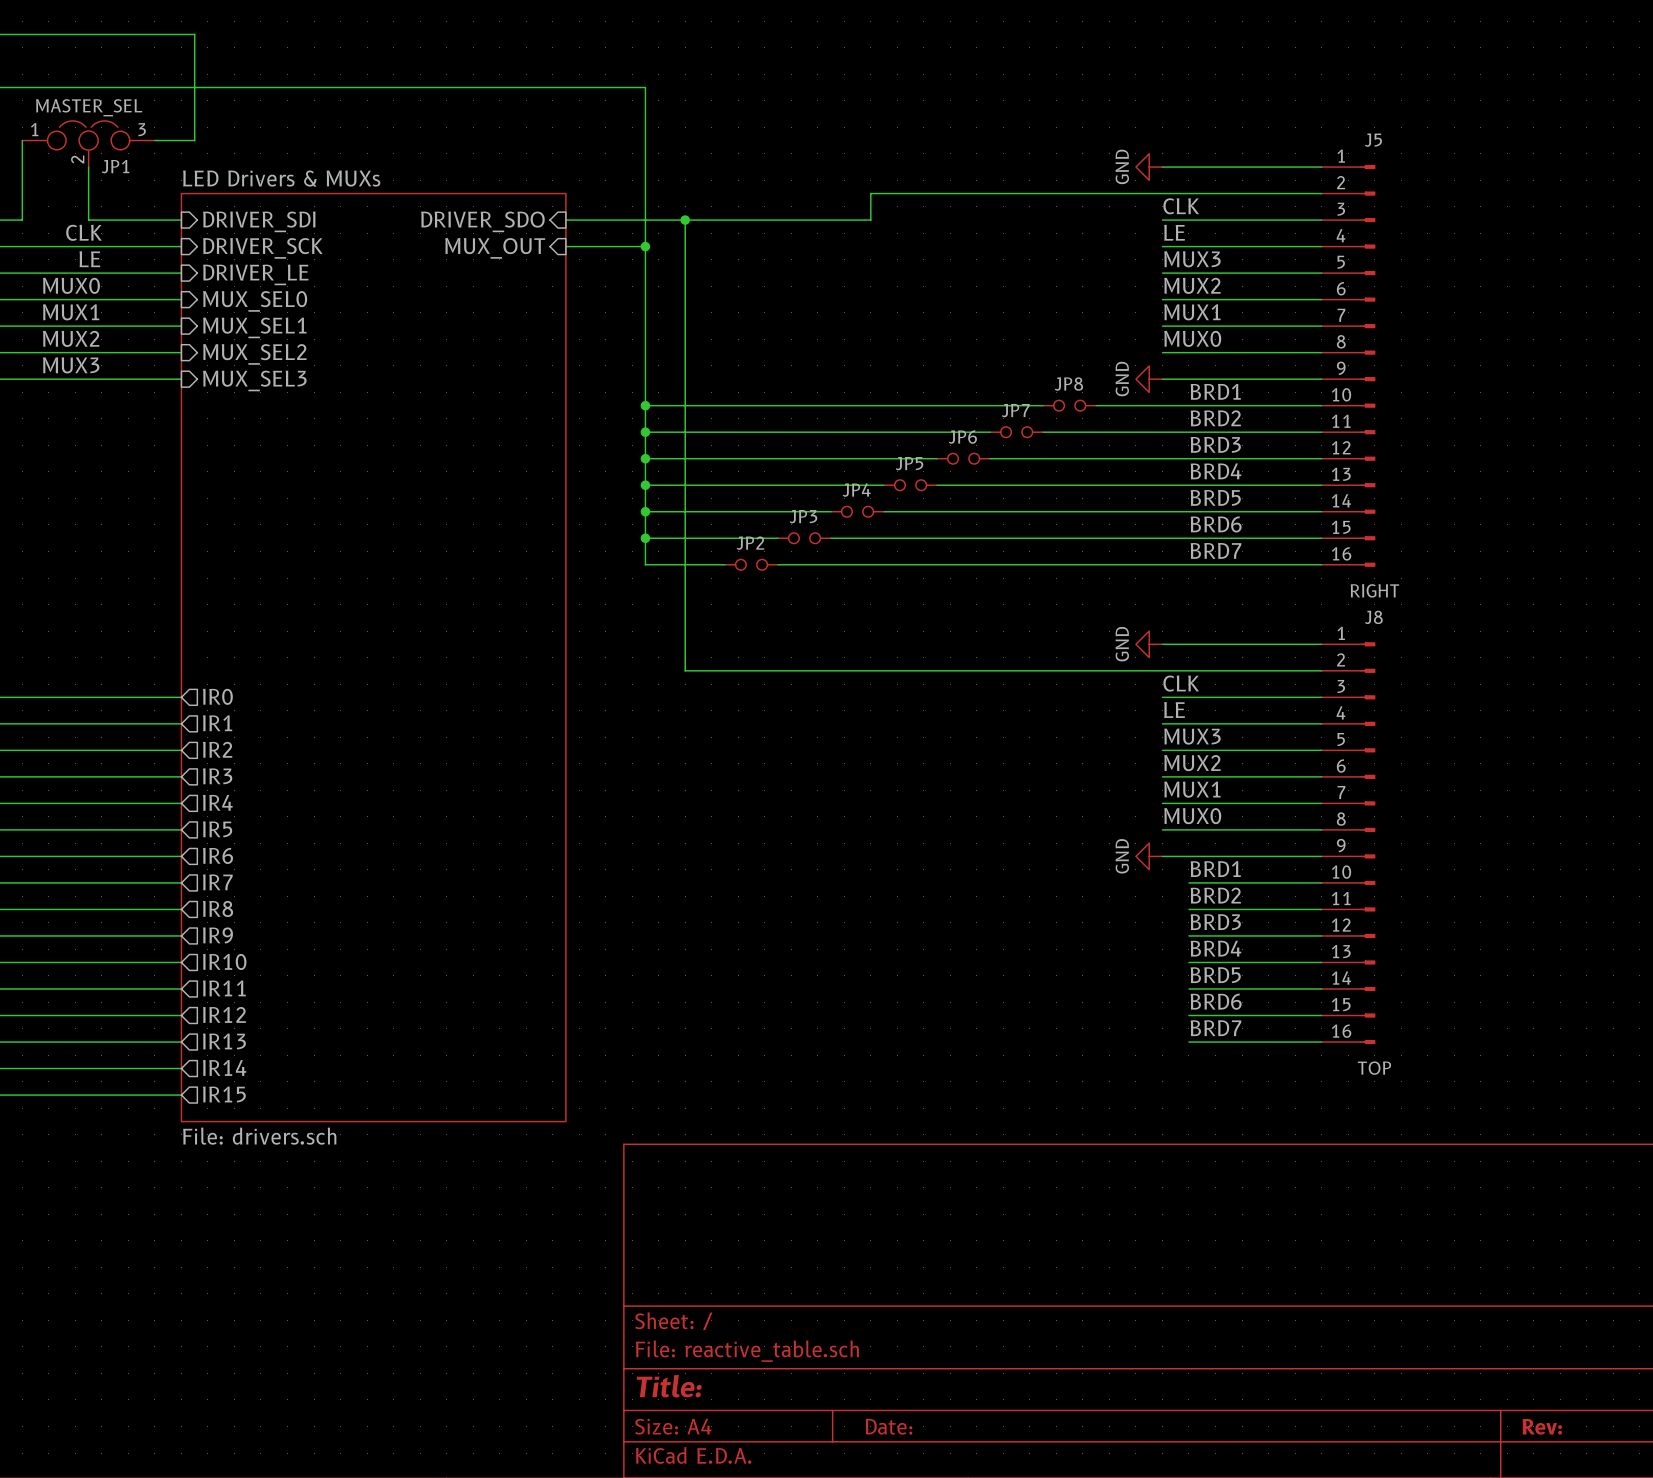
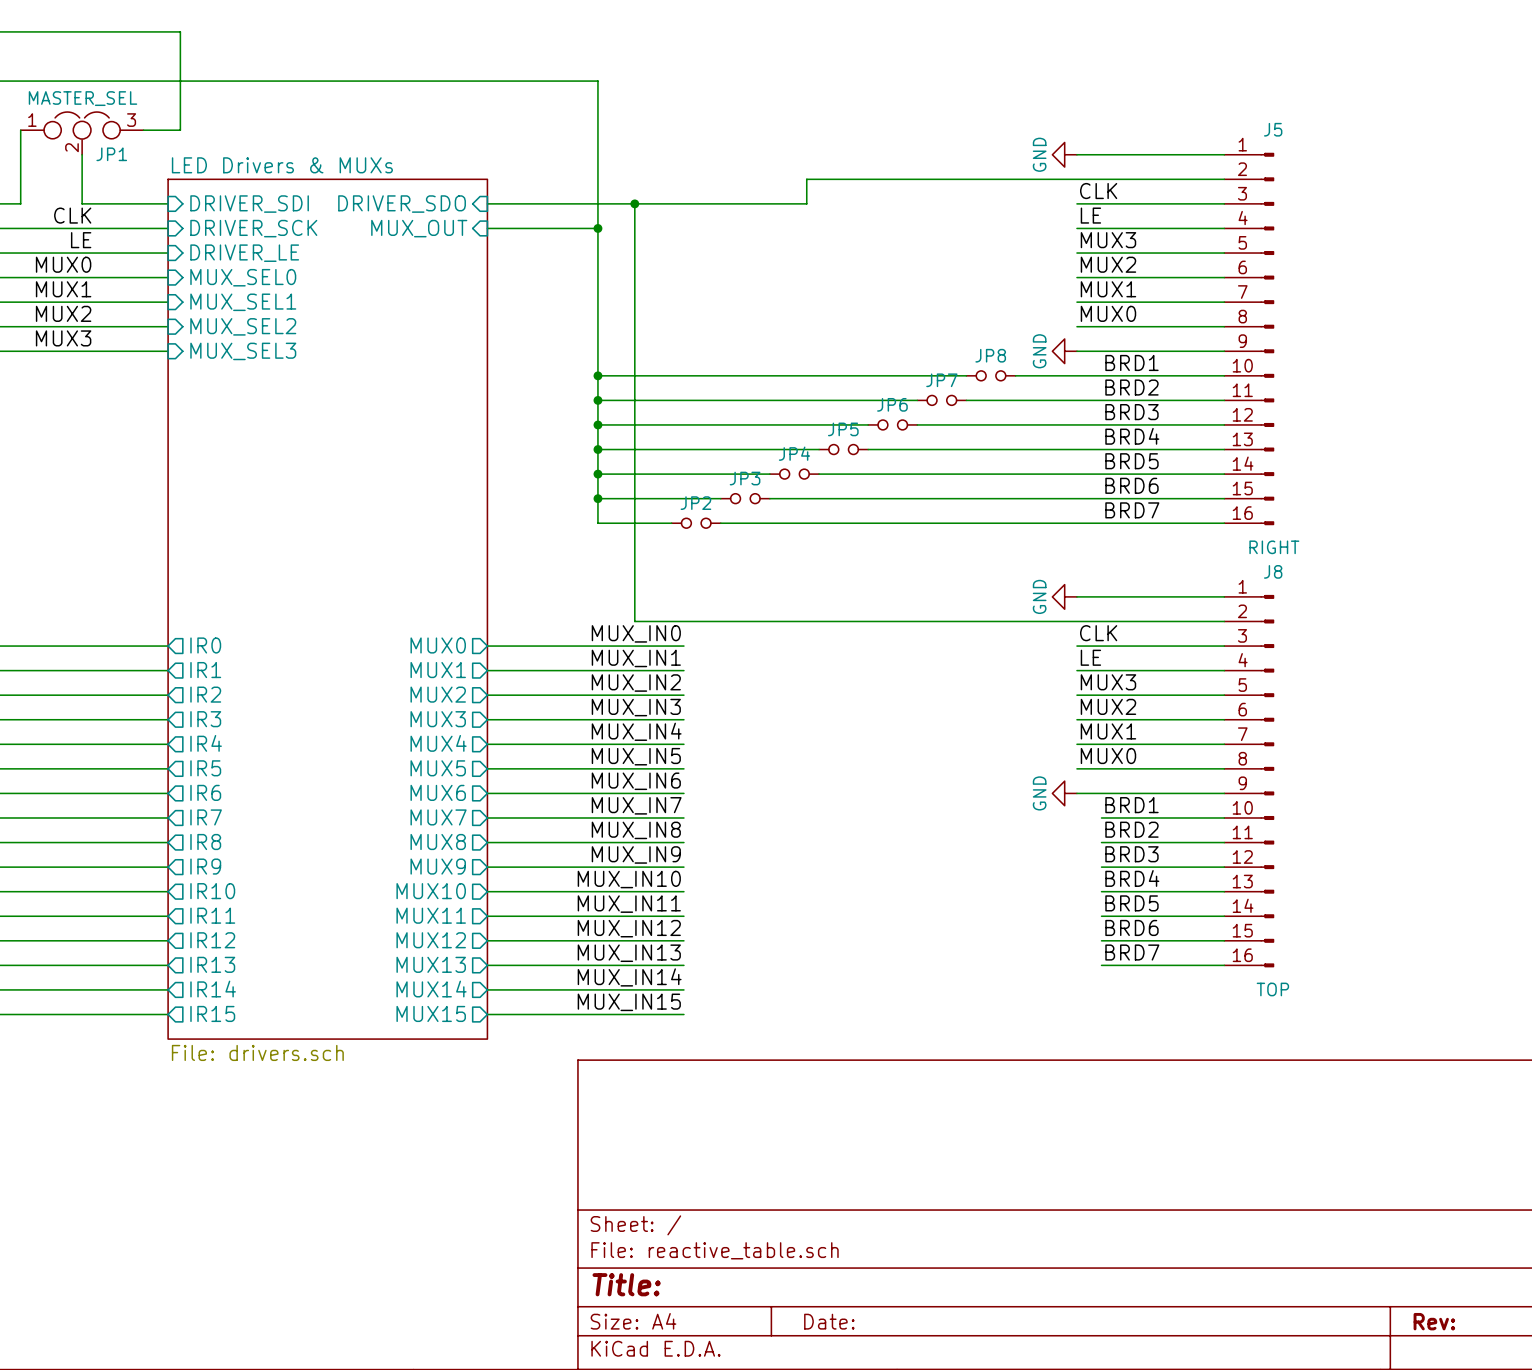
wire: none -> (487, 203) (524, 203)
sheet pin position: DRIVER_SDO (482, 221) -> DRIVER_SDO (402, 204)
wire: none -> (487, 228) (524, 228)
sheet pin position: MUX_OUT (495, 248) -> MUX_OUT (419, 228)
sheet LED Drivers & MUXs: none -> File: drivers.sch (327, 609)
sheet LED Drivers & MUXs: File: drivers.sch (373, 657) -> none
label: none -> MUX_IN0 (636, 633)
sheet pin: none -> MUX0 (438, 645)
wire: none -> (487, 646) (683, 646)
label: none -> MUX_IN1 (636, 658)
sheet pin: none -> MUX1 (438, 670)
wire: none -> (487, 670) (683, 670)
label: none -> MUX_IN2 (636, 683)
sheet pin: none -> MUX2 (438, 694)
wire: none -> (487, 695) (683, 695)
label: none -> MUX_IN3 (636, 707)
sheet pin: none -> MUX3 (438, 719)
wire: none -> (487, 719) (683, 719)
label: none -> MUX_IN4 (636, 731)
sheet pin: none -> MUX4 (438, 743)
wire: none -> (487, 744) (683, 744)
label: none -> MUX_IN5 (636, 756)
sheet pin: none -> MUX5 (438, 768)
wire: none -> (487, 768) (683, 768)
label: none -> MUX_IN6 (636, 781)
sheet pin: none -> MUX6 (438, 792)
wire: none -> (487, 793) (683, 793)
label: none -> MUX_IN7 (636, 805)
sheet pin: none -> MUX7 (438, 817)
wire: none -> (487, 817) (683, 817)
label: none -> MUX_IN8 (636, 830)
sheet pin: none -> MUX8 (438, 842)
wire: none -> (487, 842) (683, 842)
label: none -> MUX_IN9 (636, 854)
sheet pin: none -> MUX9 (438, 866)
wire: none -> (487, 867) (683, 867)
label: none -> MUX_IN10 (629, 879)
sheet pin: none -> MUX10 (431, 891)
wire: none -> (487, 891) (683, 891)
label: none -> MUX_IN11 (629, 904)
sheet pin: none -> MUX11 (431, 915)
wire: none -> (487, 916) (683, 916)
label: none -> MUX_IN12 (629, 928)
sheet pin: none -> MUX12 (431, 940)
wire: none -> (487, 940) (683, 940)
label: none -> MUX_IN13 (629, 953)
sheet pin: none -> MUX13 (431, 964)
wire: none -> (487, 965) (683, 965)
label: none -> MUX_IN14 (629, 977)
sheet pin: none -> MUX14 (431, 989)
wire: none -> (487, 989) (683, 989)
label: none -> MUX_IN15 (629, 1002)
sheet pin: none -> MUX15 (431, 1013)
wire: none -> (487, 1014) (683, 1014)

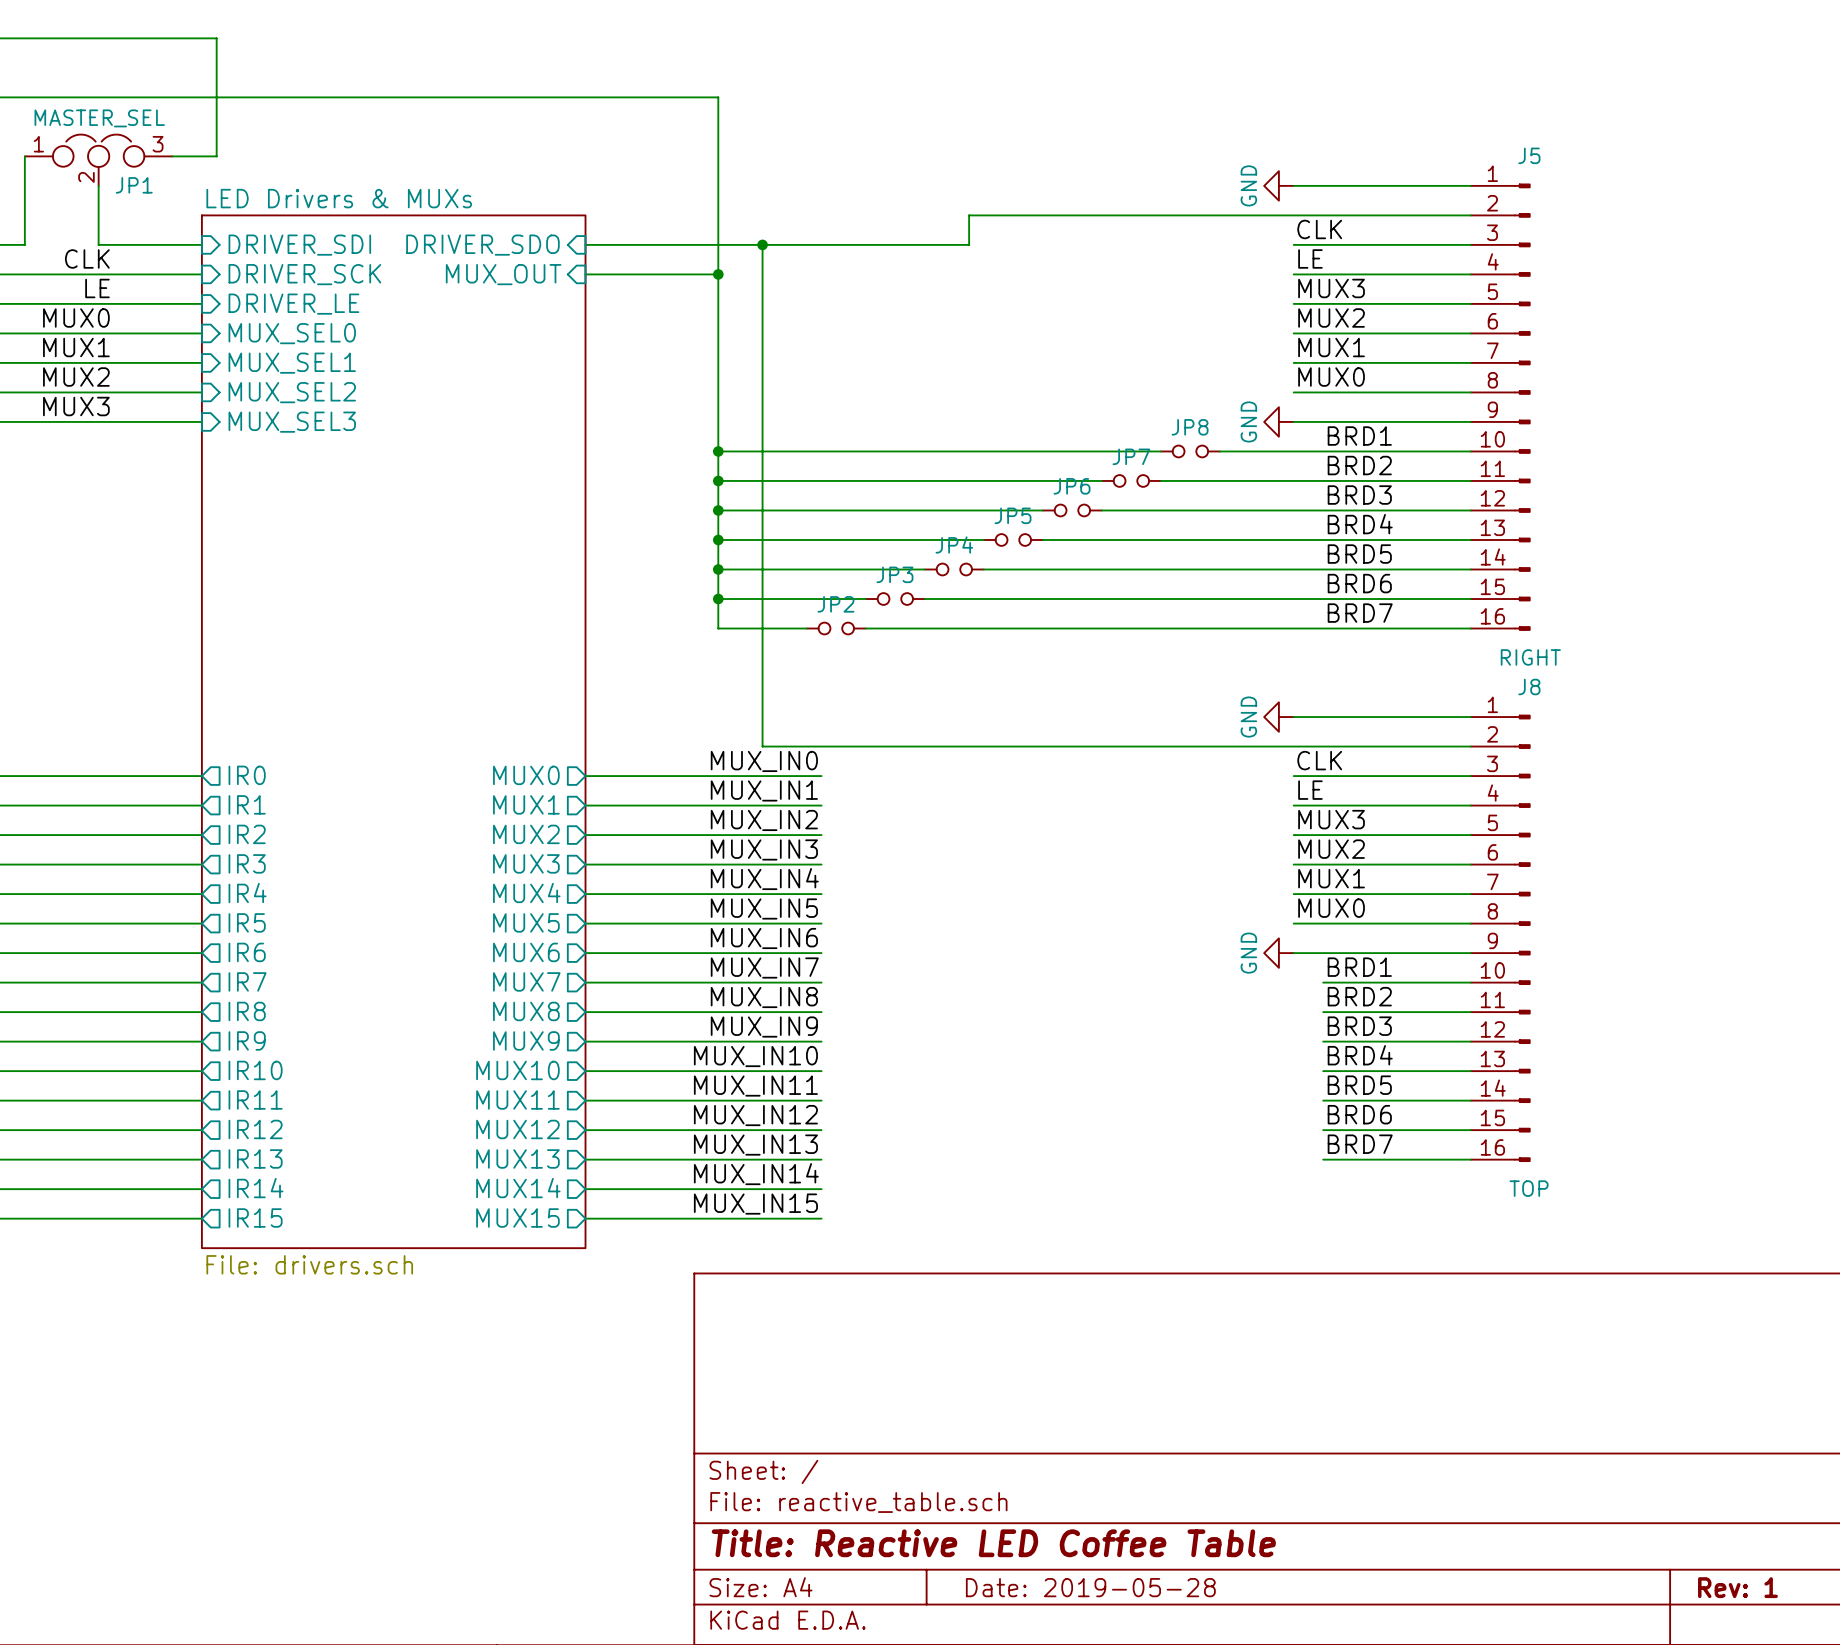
title block: Title: (626, 1284) -> Title: Reactive LED Coffee Table (993, 1543)
title block: Date: (829, 1321) -> Date: 2019-05-28 (1090, 1587)
title block: Rev: (1434, 1321) -> Rev: 1 (1737, 1587)

